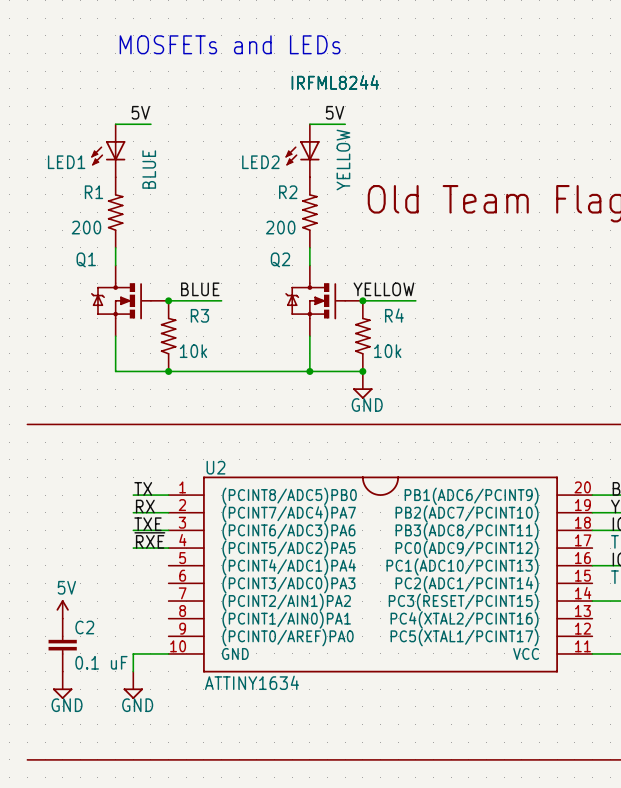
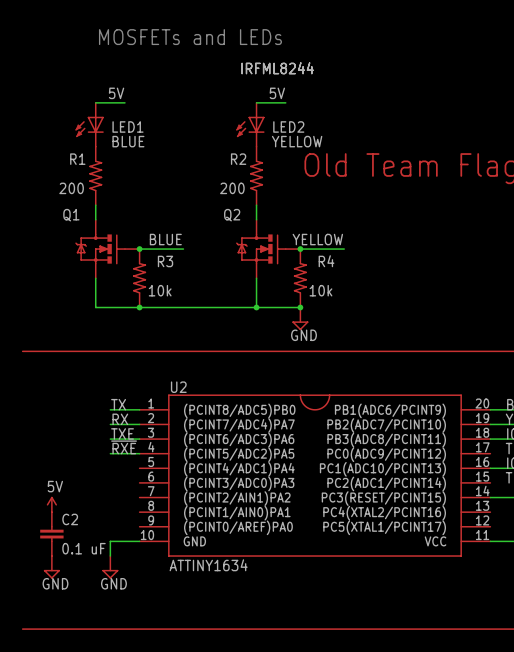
LED2 value rotation: 0° (343, 159) -> 90° clockwise (297, 141)
LED1 name position: LED1 (66, 162) -> LED1 (127, 126)
LED2 name position: LED2 (260, 162) -> LED2 (288, 126)
LED1 value rotation: 0° (149, 169) -> 90° clockwise (128, 141)

